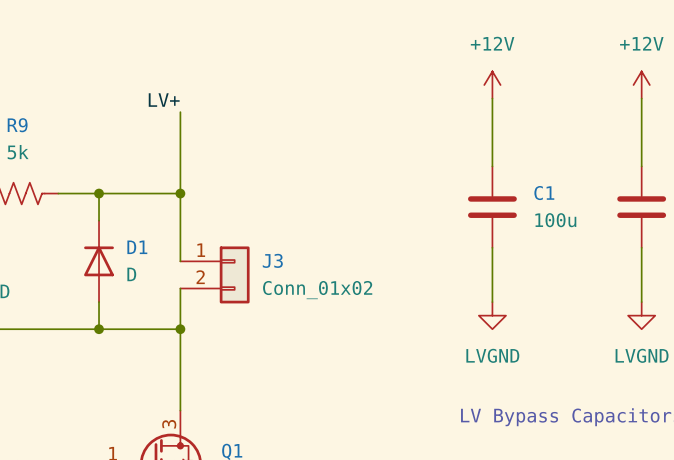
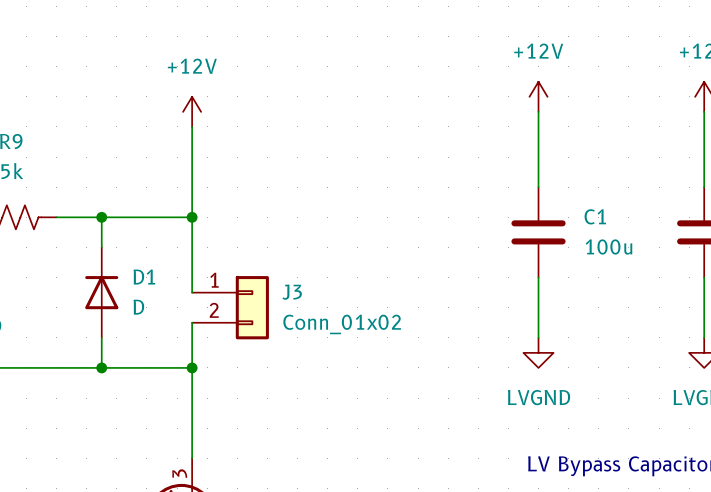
power symbol: none -> +12V (192, 111)
label: LV+ (164, 100) -> none

